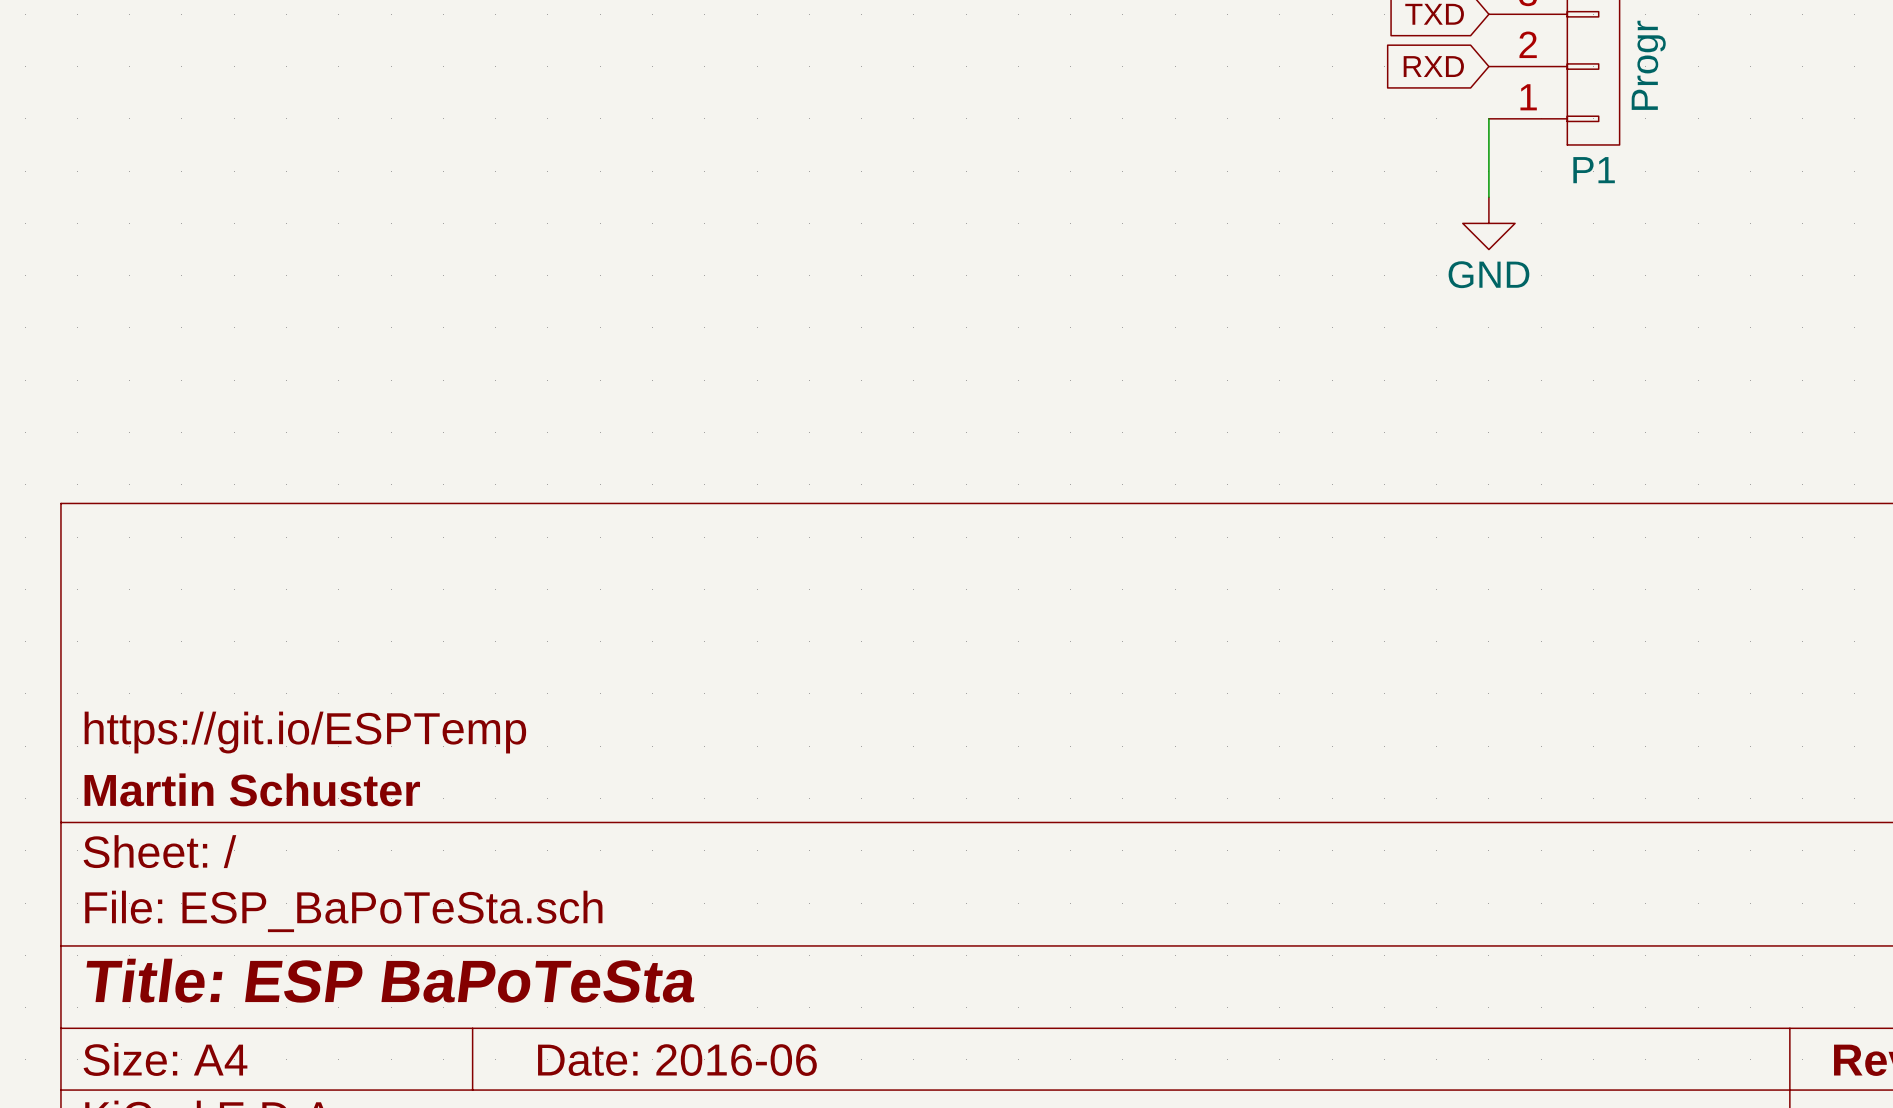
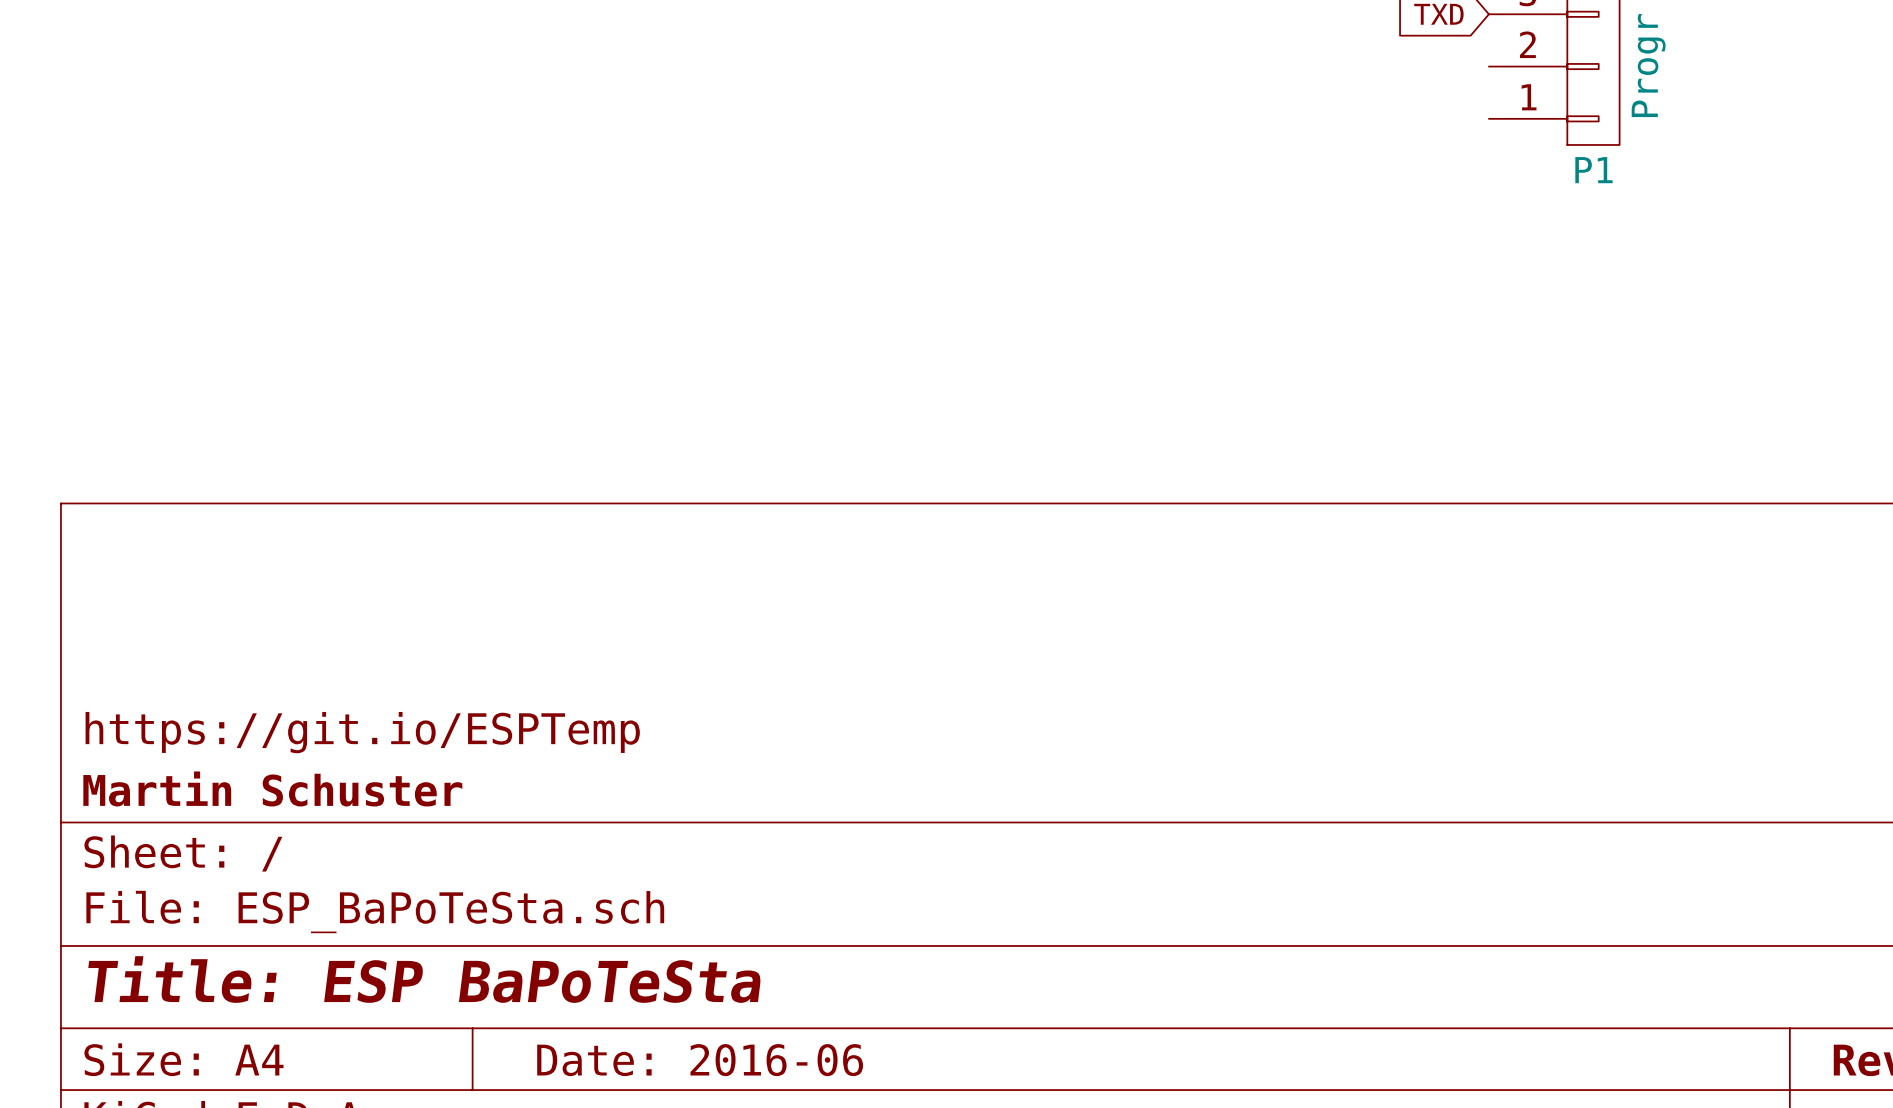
global label: RXD (1433, 66) -> none
wire: (1488, 118) (1488, 197) -> none
power symbol: GND (1488, 223) -> none

